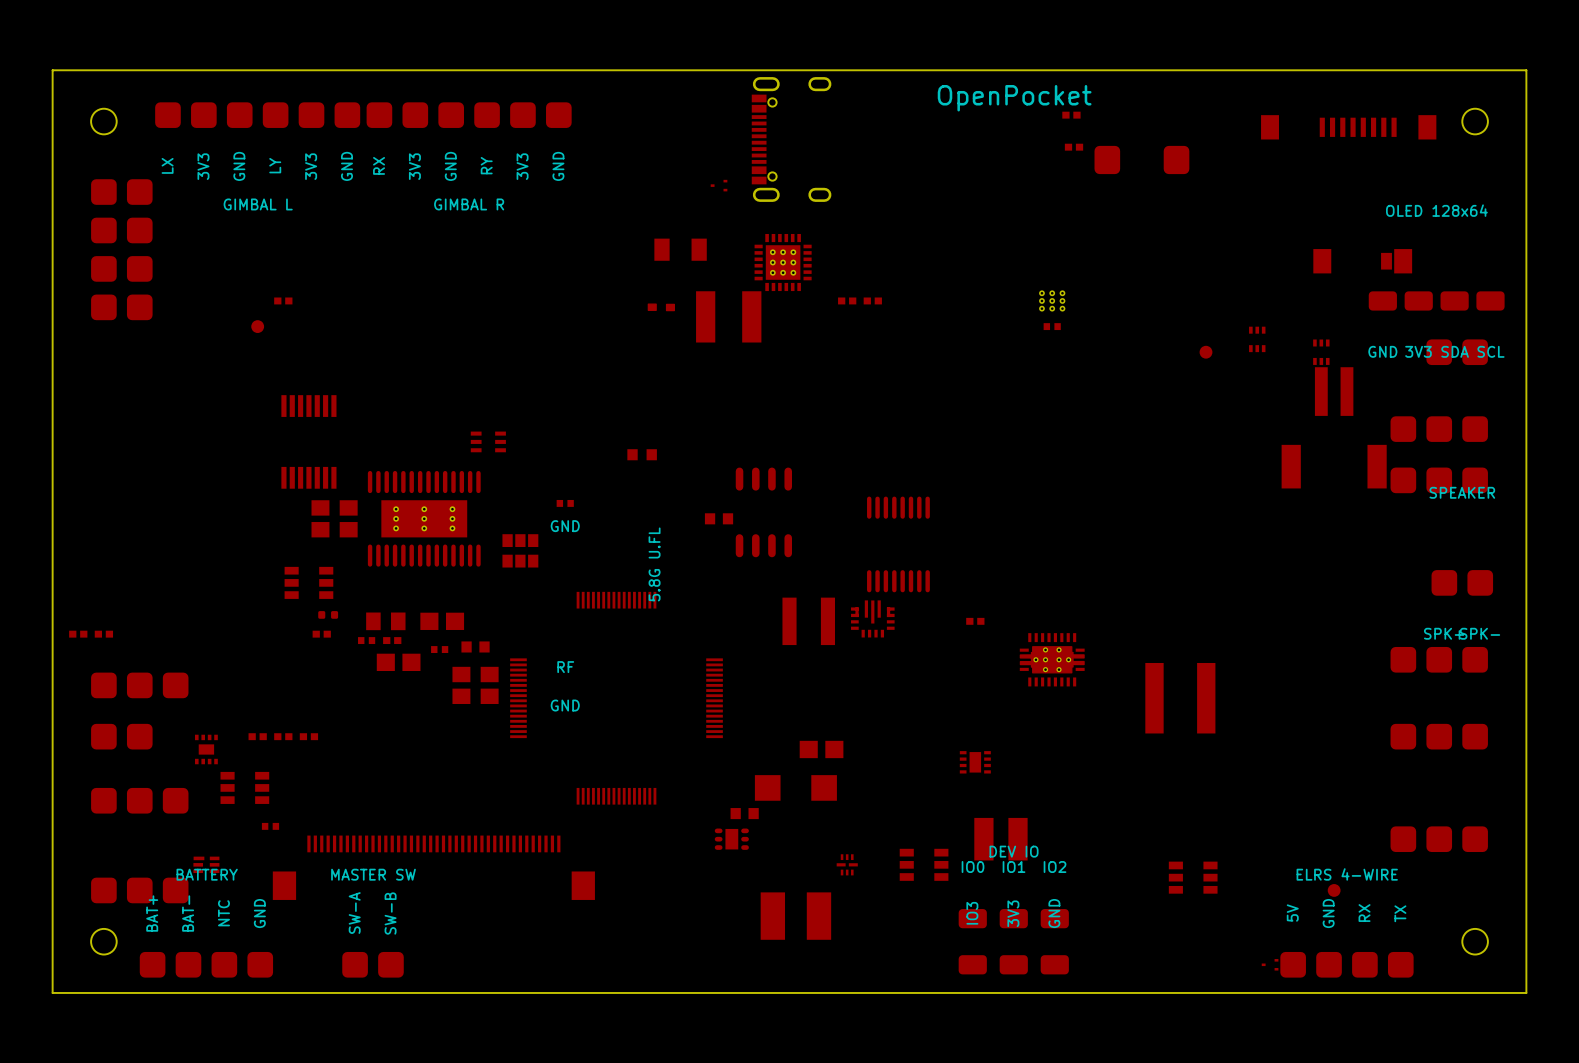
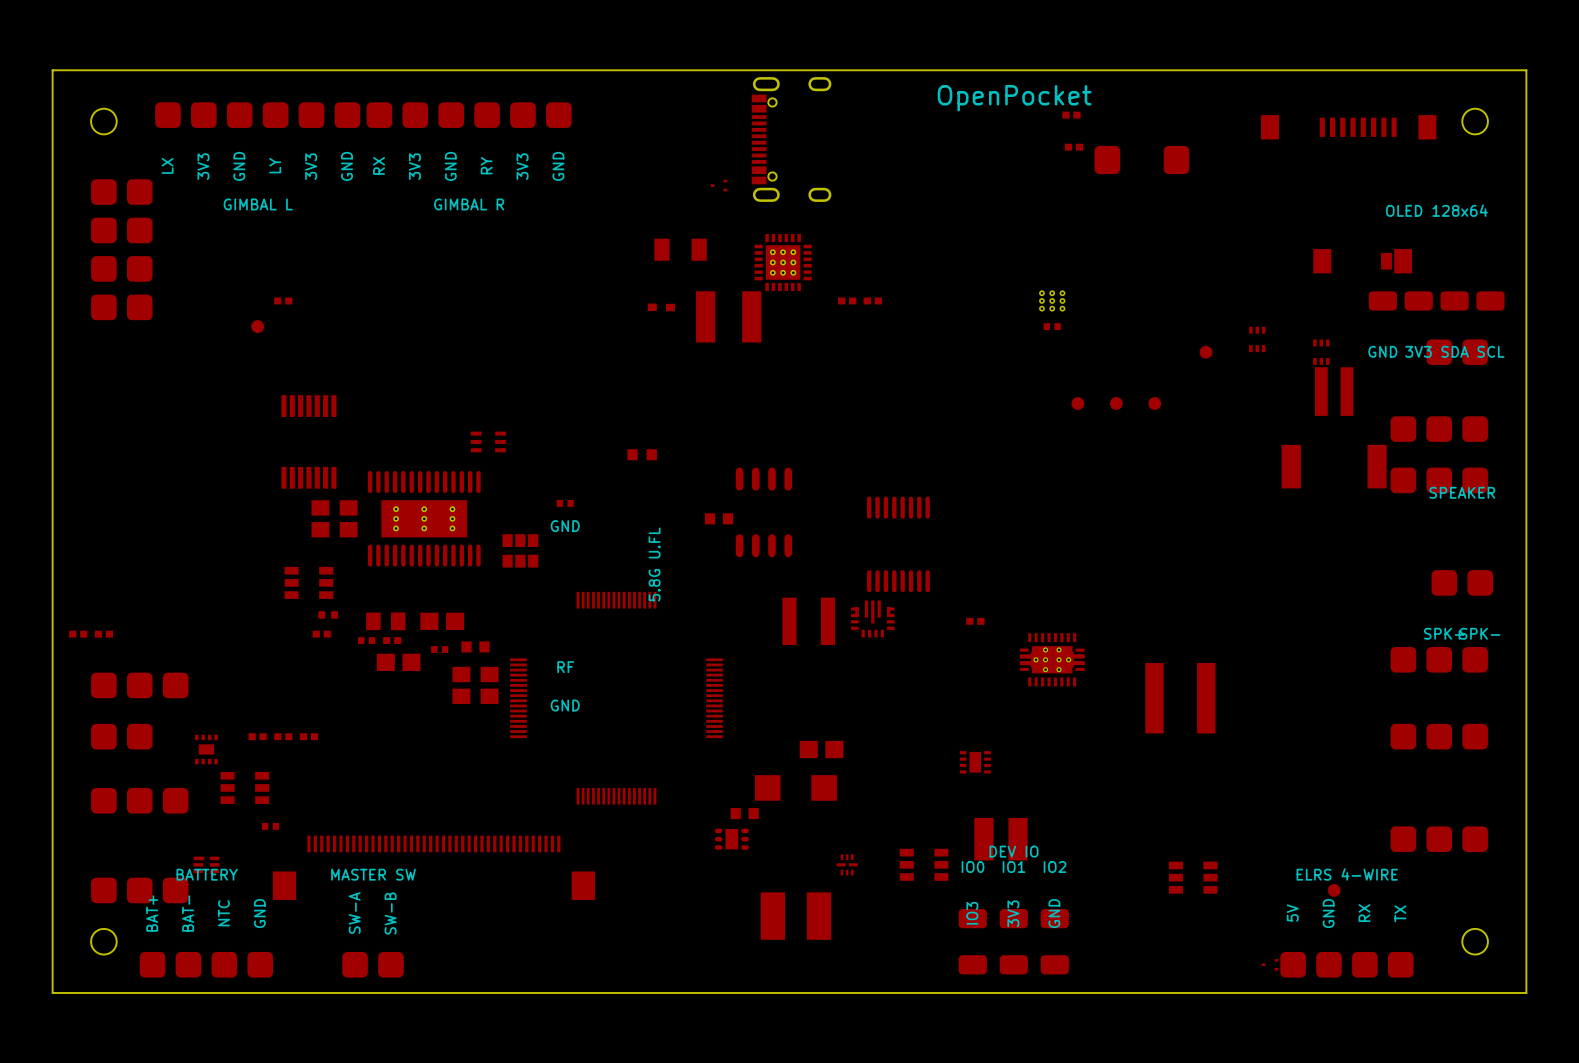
part: none -> (1077, 403)
part: none -> (1116, 403)
part: none -> (1154, 403)

